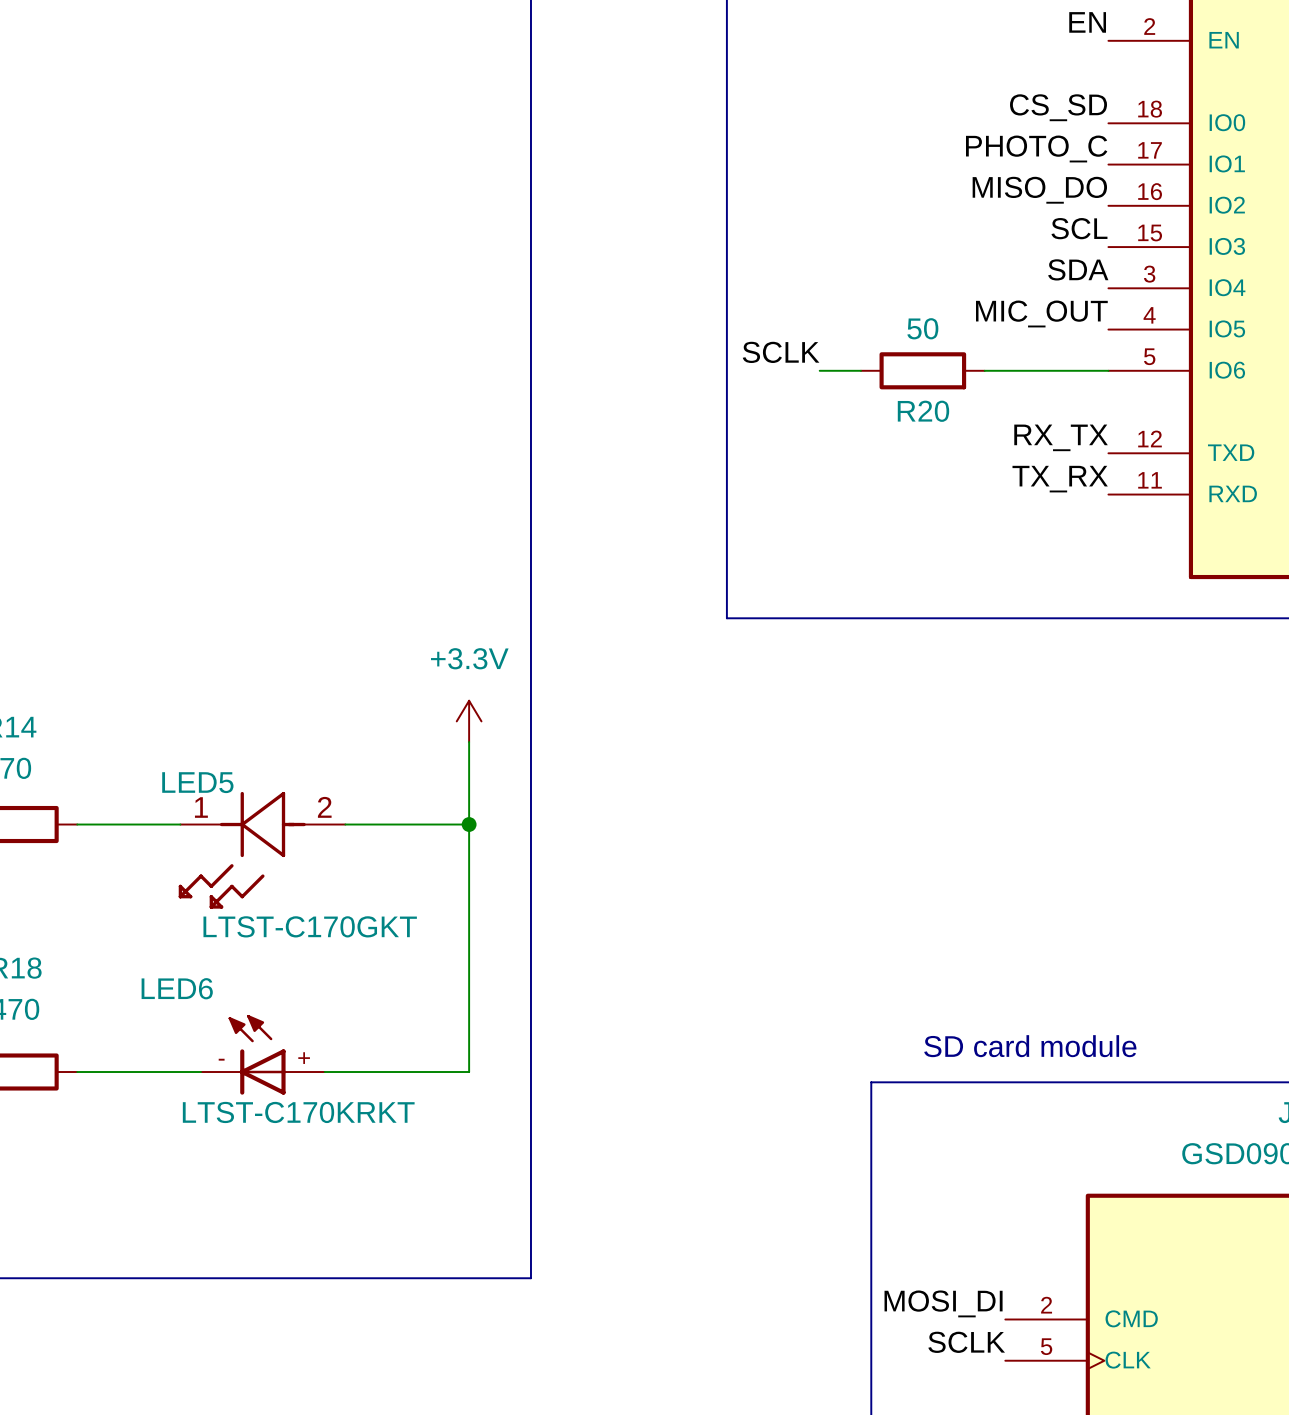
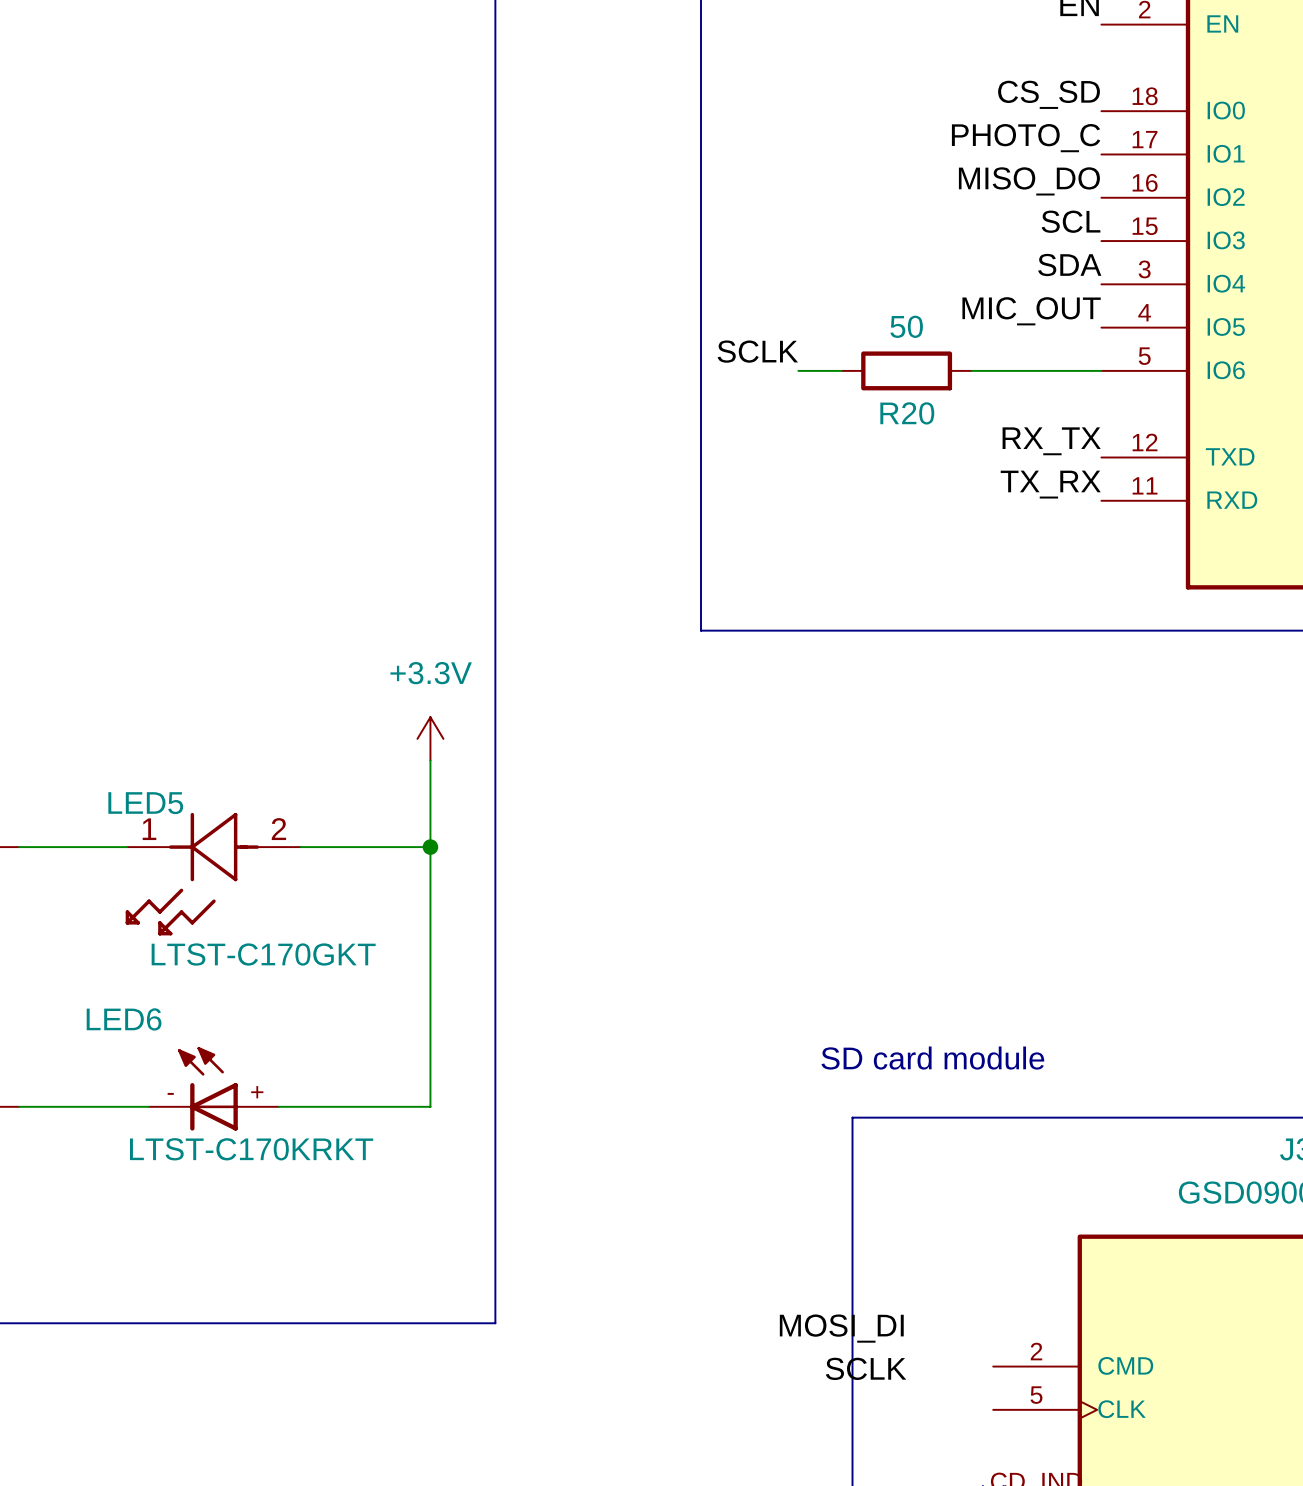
text position: SD card module (1030, 1046) -> SD card module (932, 1058)
label position: MOSI_DI (943, 1303) -> MOSI_DI (841, 1328)
label position: SCLK (966, 1342) -> SCLK (866, 1368)

